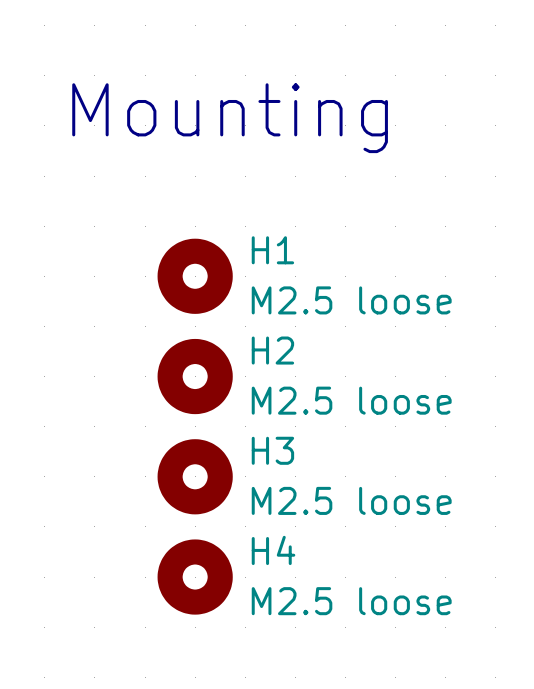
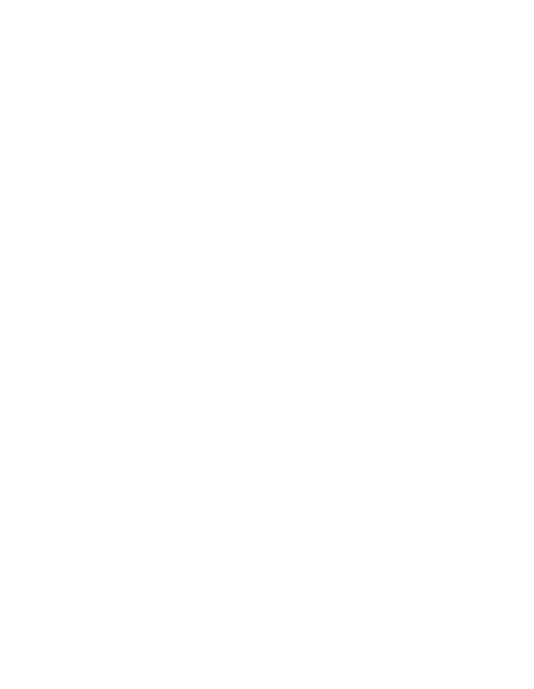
text: Mounting (230, 118) -> none
H1: M2.5 loose (195, 276) -> none
H2: M2.5 loose (195, 376) -> none
H3: M2.5 loose (195, 476) -> none
H4: M2.5 loose (195, 577) -> none

